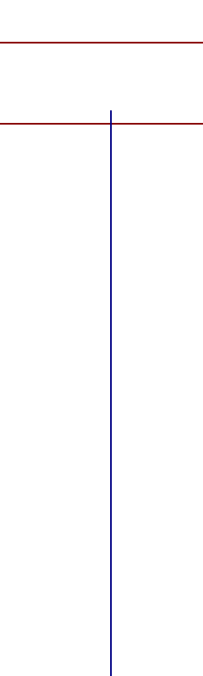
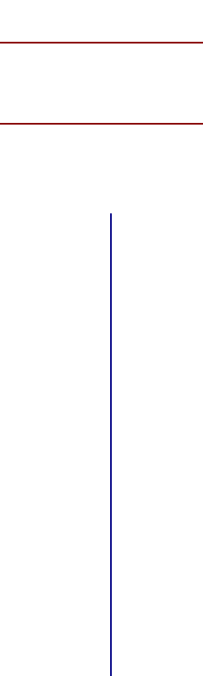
line: (110, 110) (110, 213) -> none

